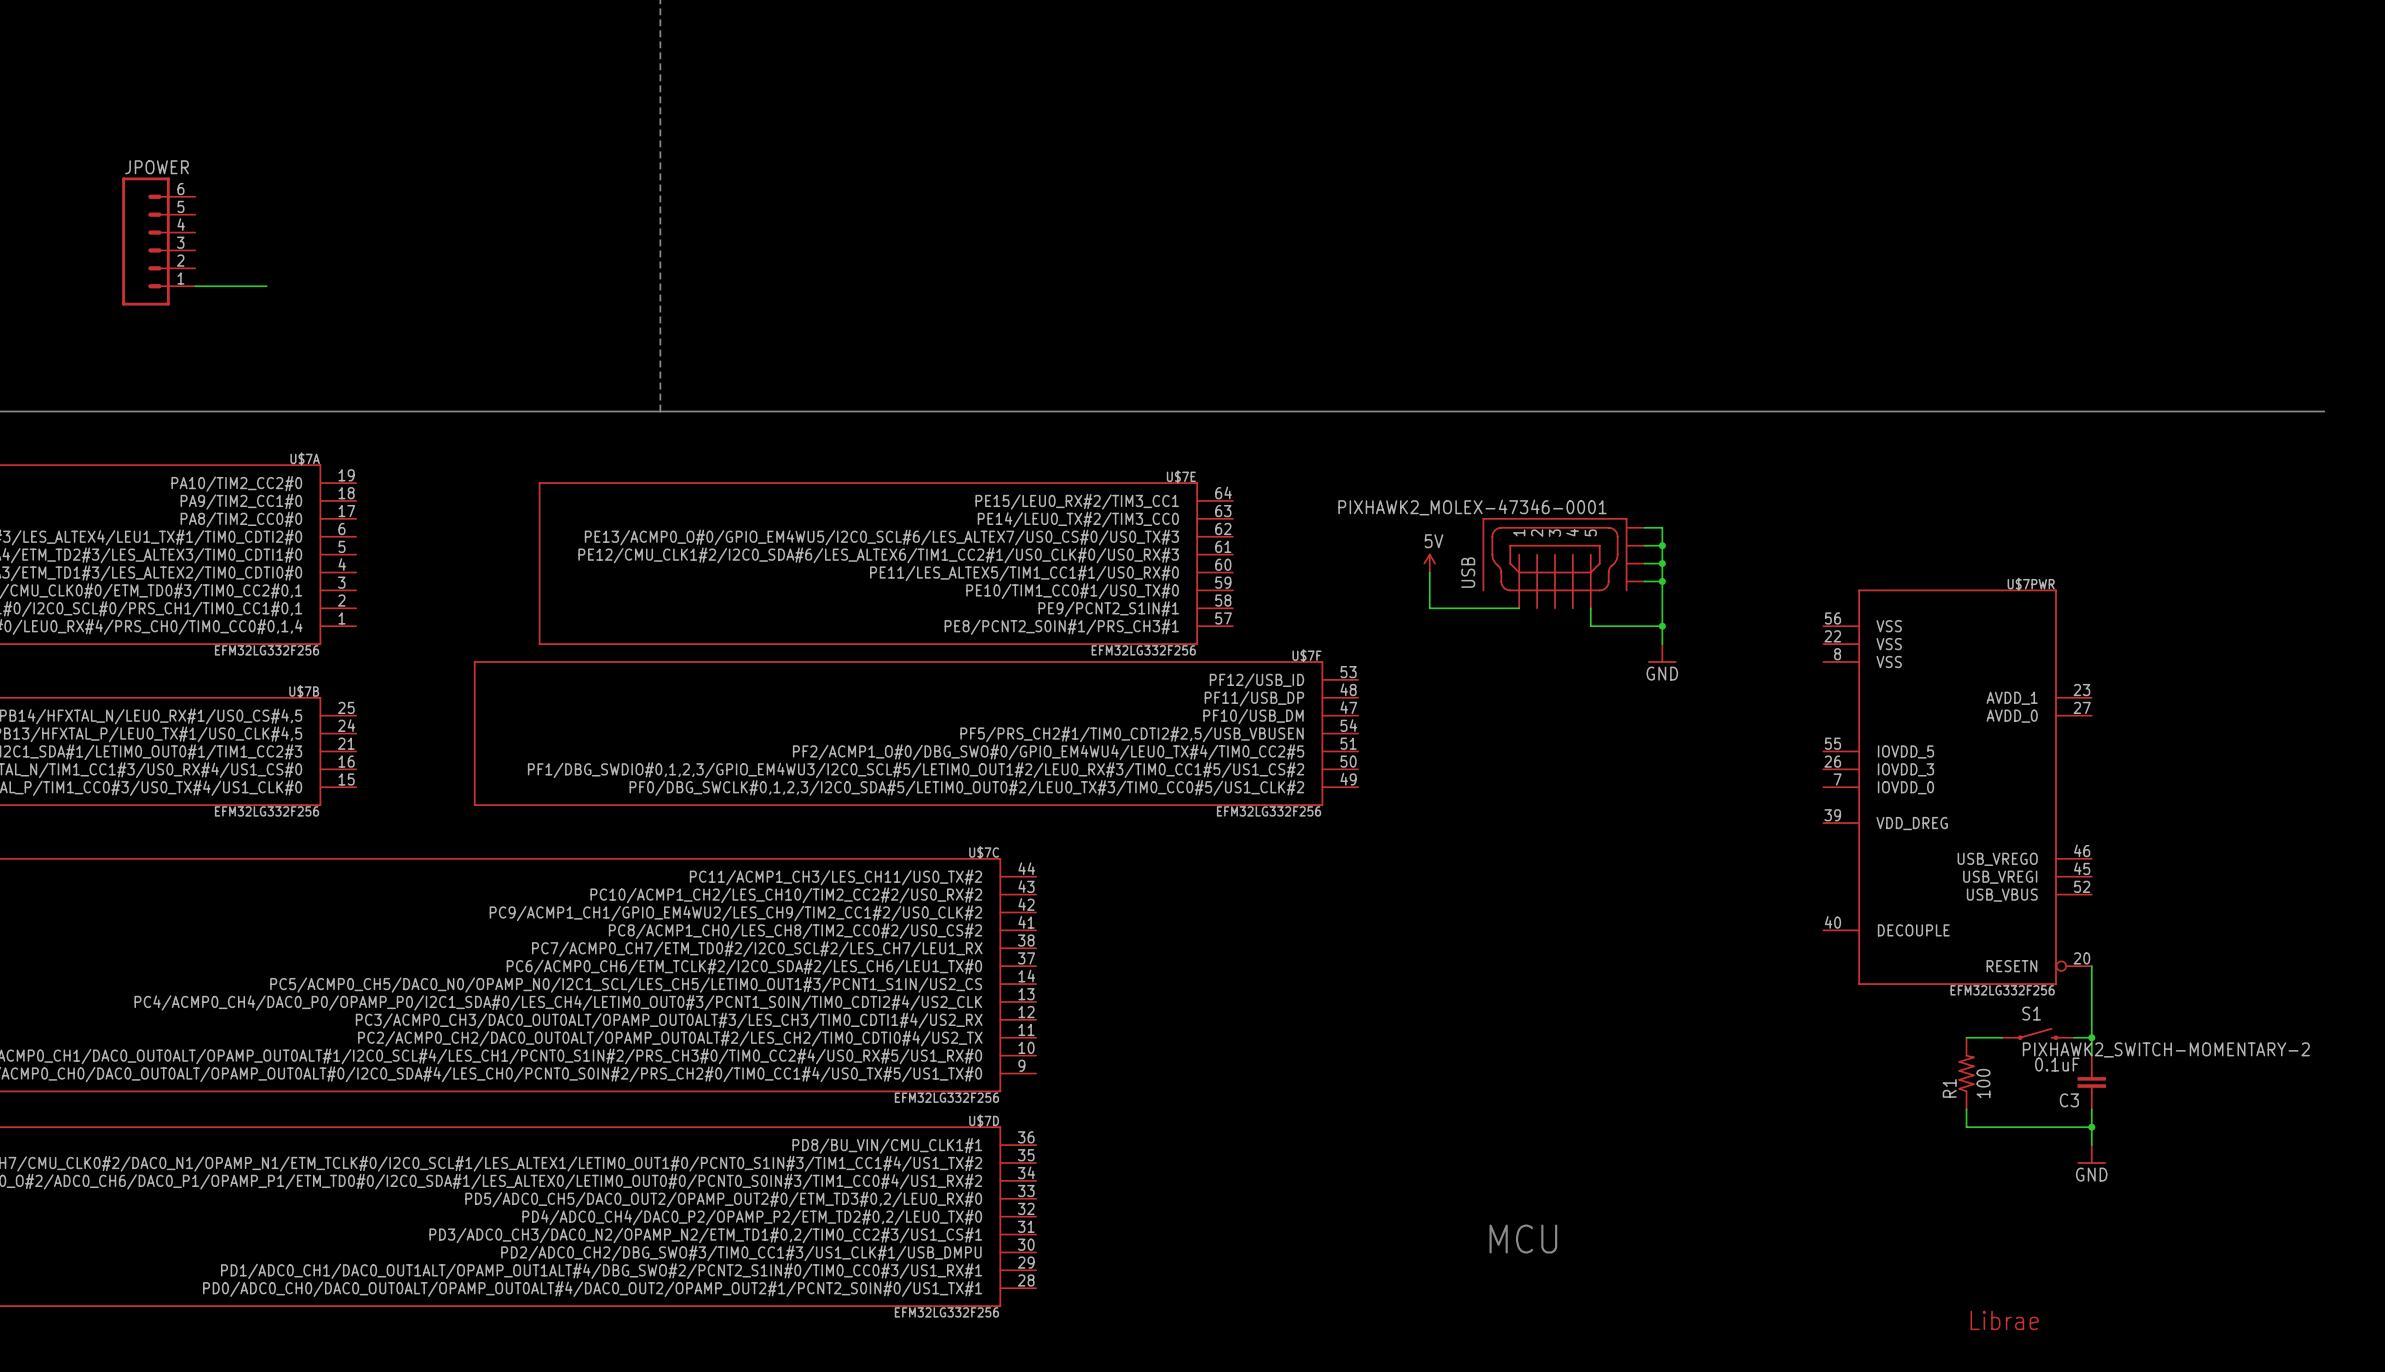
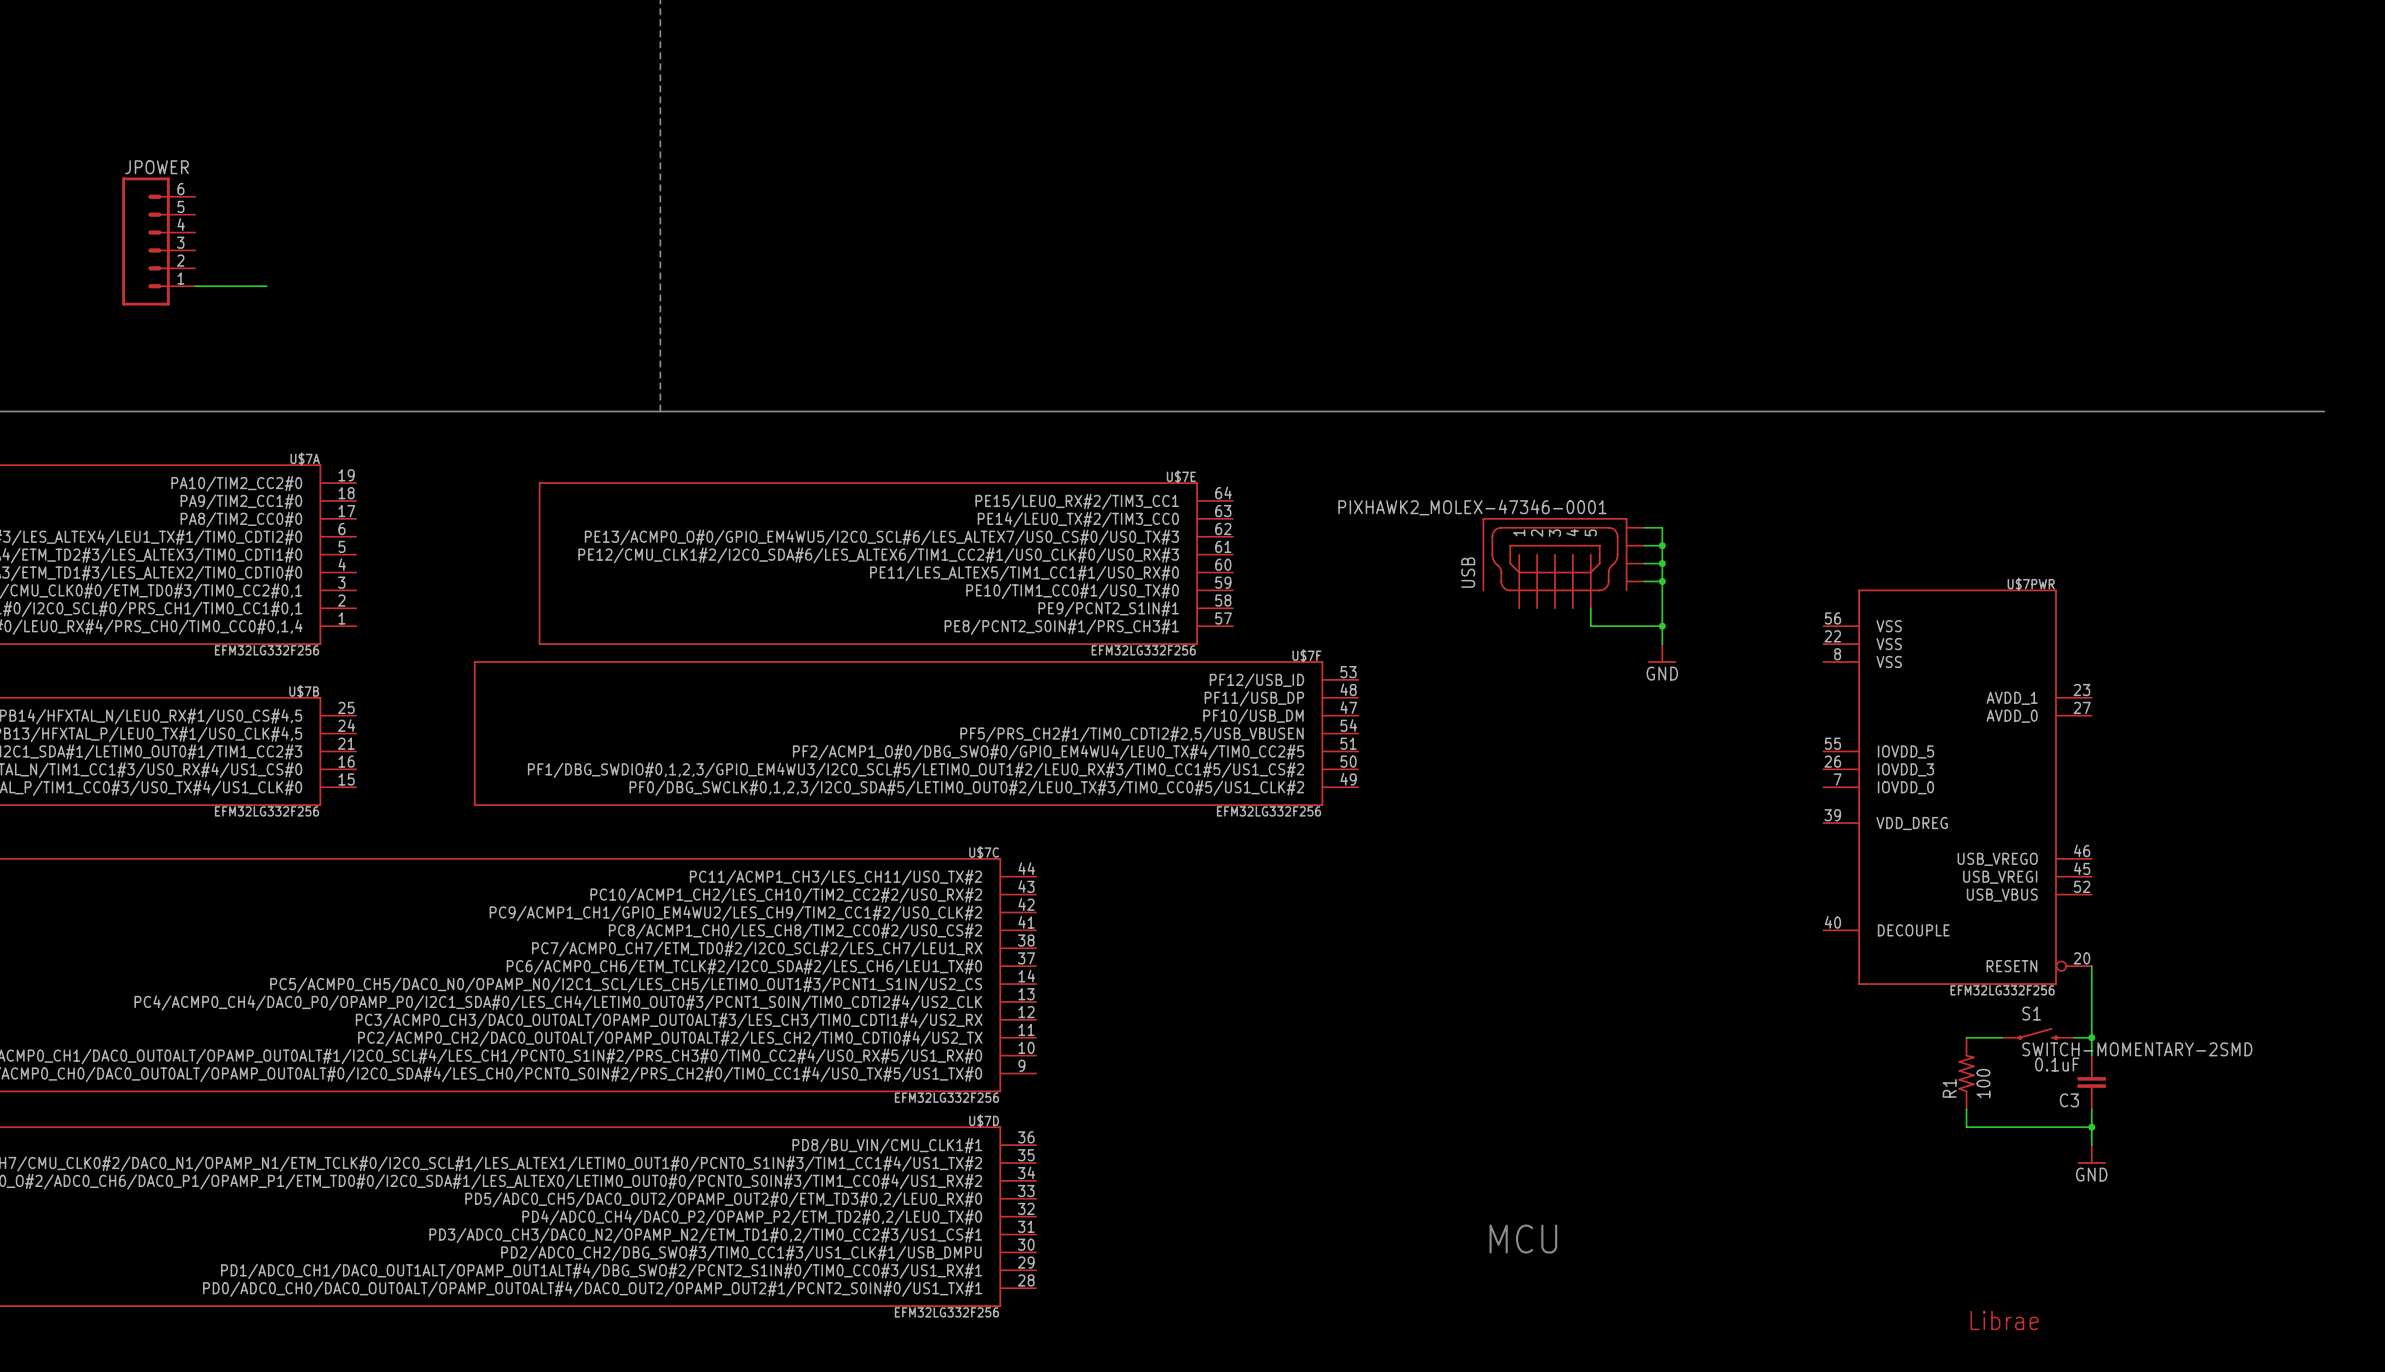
power symbol: 5V (1429, 563) -> none
wire: (1429, 572) (1429, 608) (1519, 608) -> none
S1 value: PIXHAWK2_SWITCH-MOMENTARY-2 (2166, 1049) -> SWITCH-MOMENTARY-2SMD (2137, 1049)

